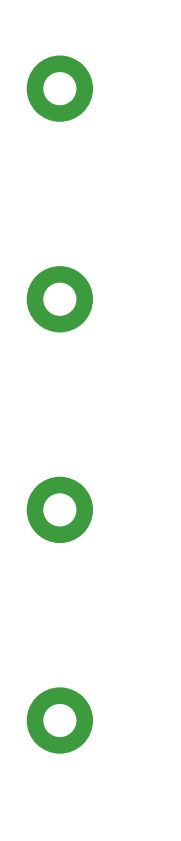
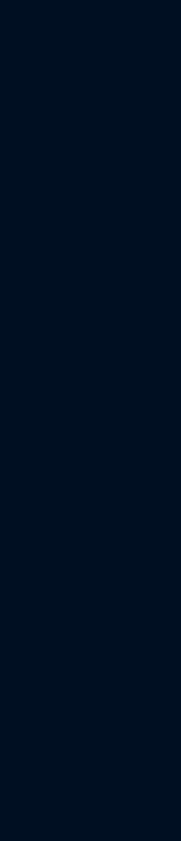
part: (59, 88) -> none
part: (59, 299) -> none
part: (59, 509) -> none
part: (59, 720) -> none

